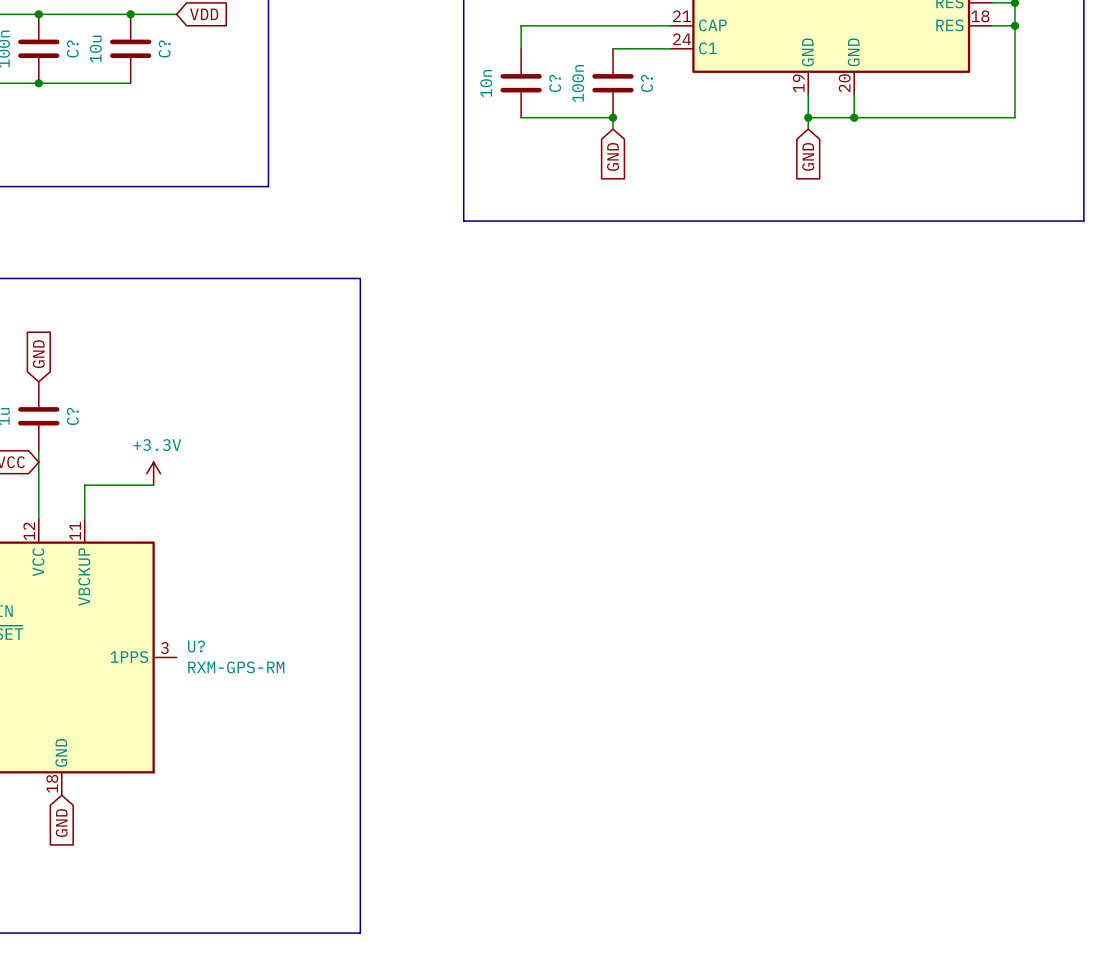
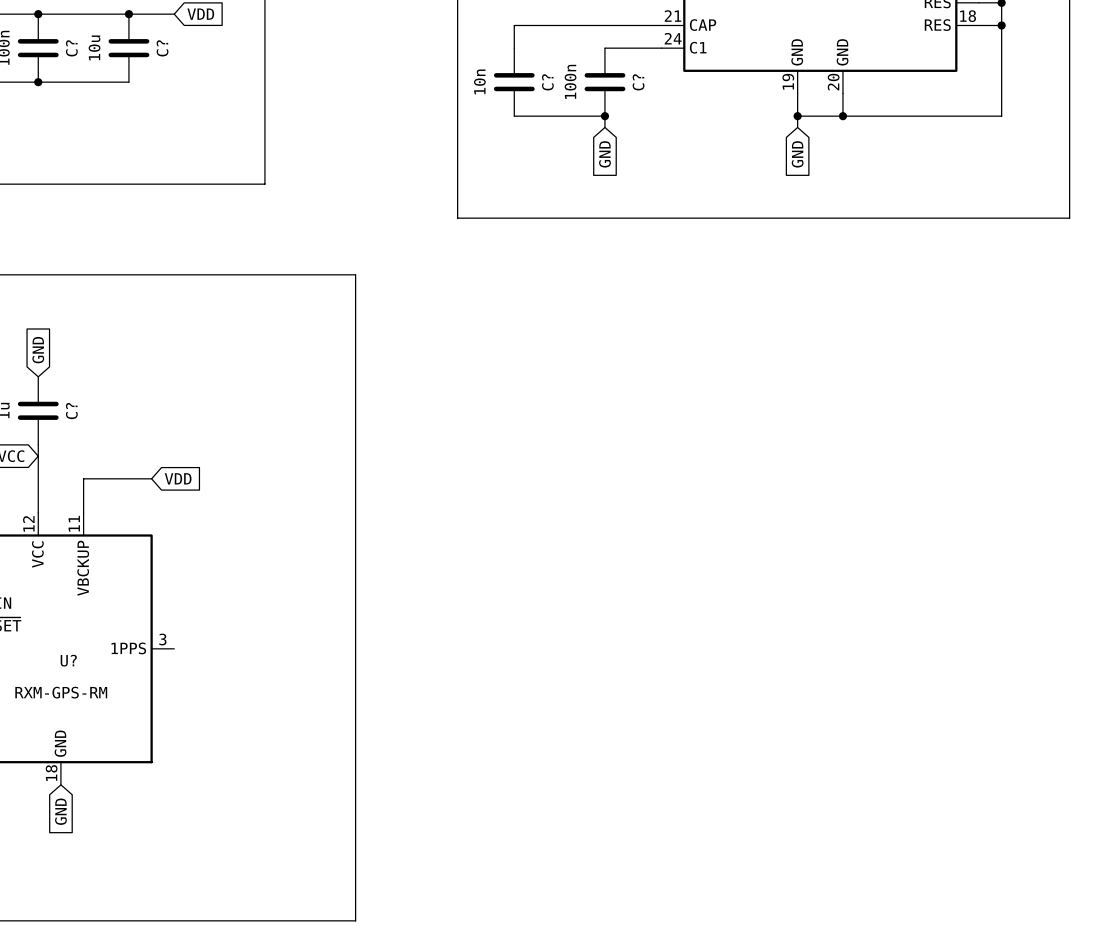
power symbol: +3.3V (153, 473) -> none
global label: none -> VDD (178, 478)
U? name position: U? (196, 646) -> U? (68, 660)
U? value position: RXM-GPS-RM (236, 667) -> RXM-GPS-RM (61, 692)

